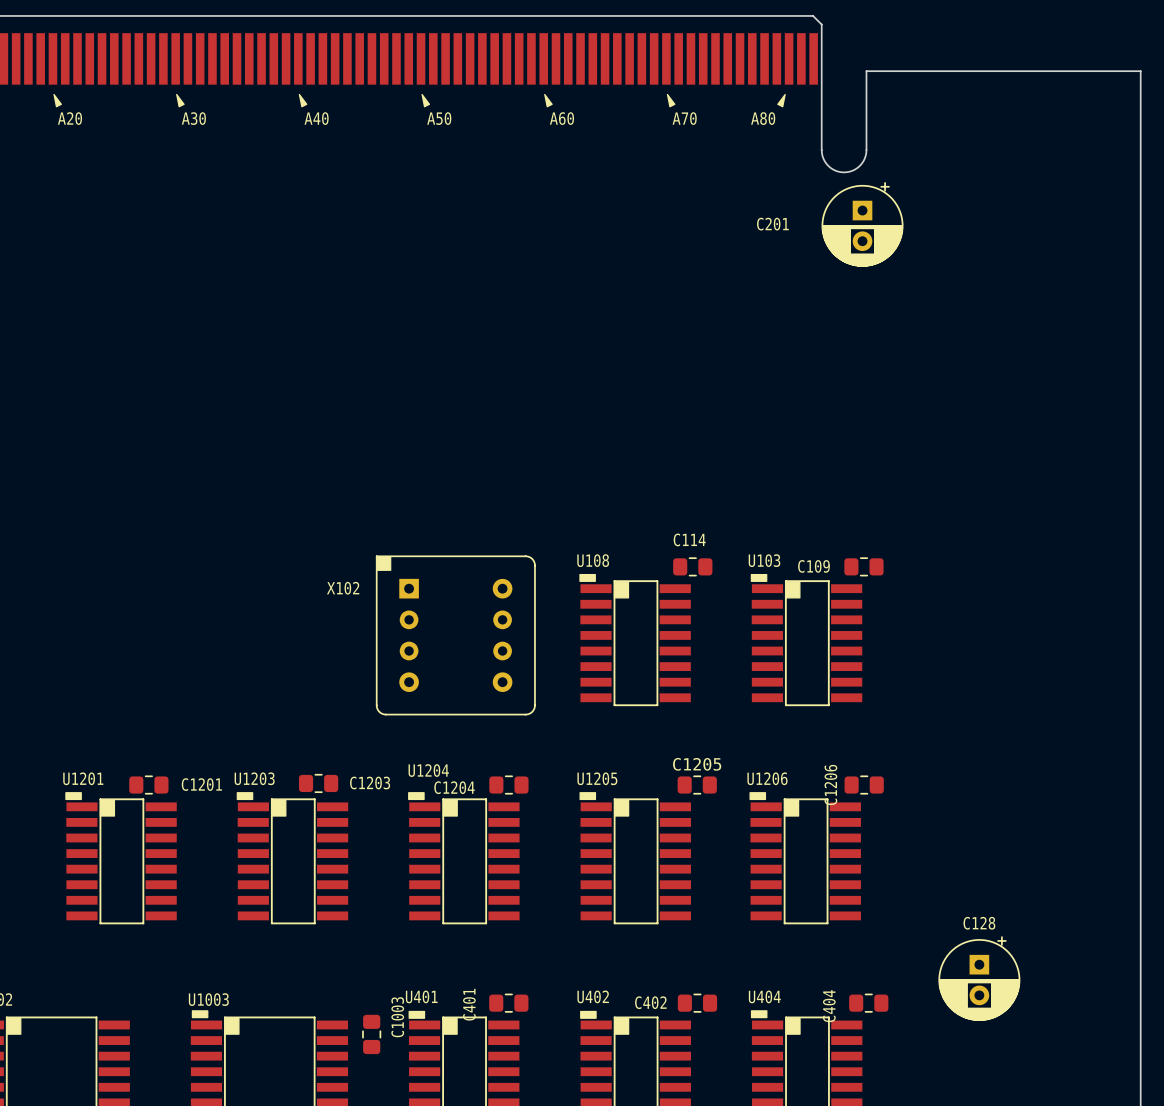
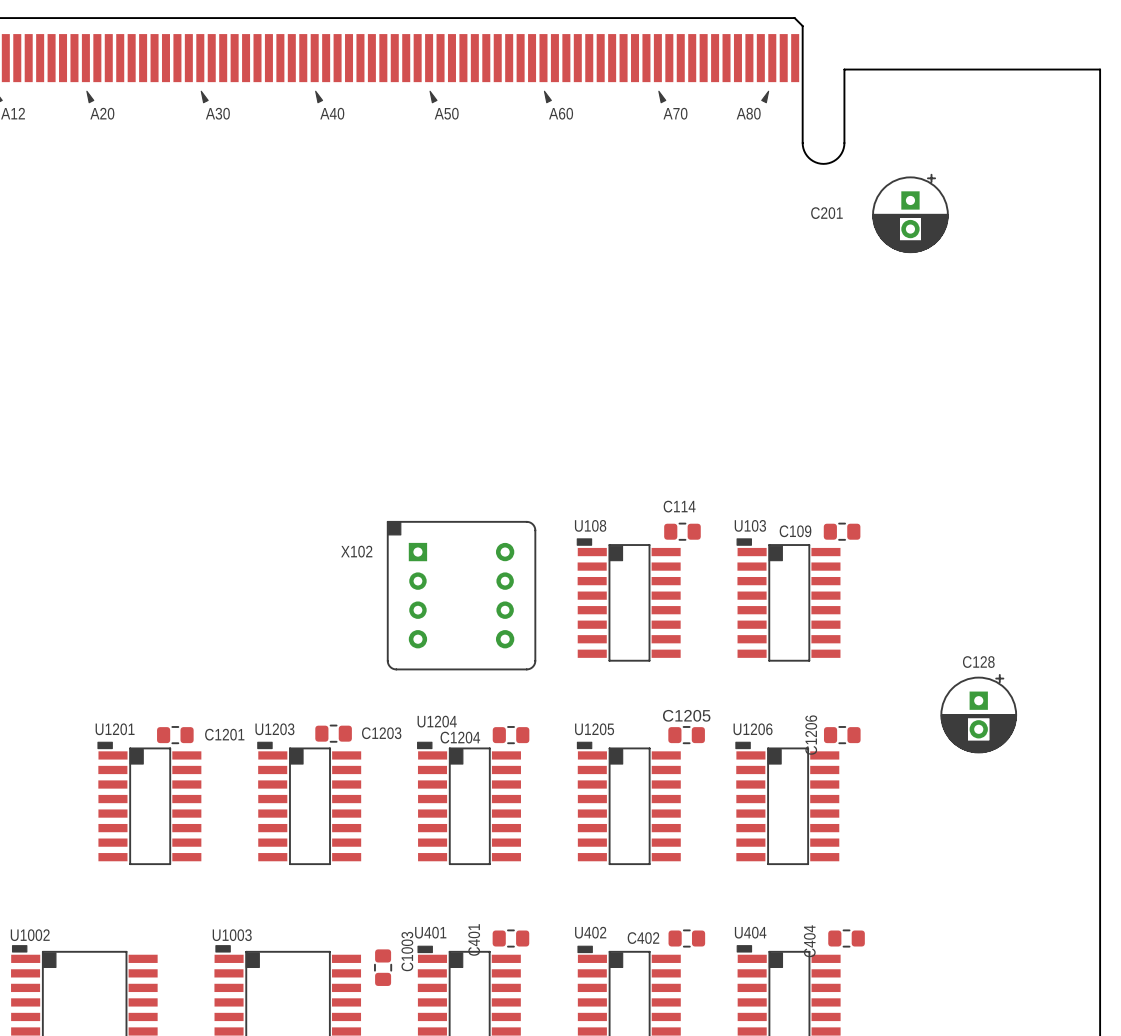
C201 position: (862, 224) -> (910, 213)
C128 position: (979, 978) -> (978, 713)

